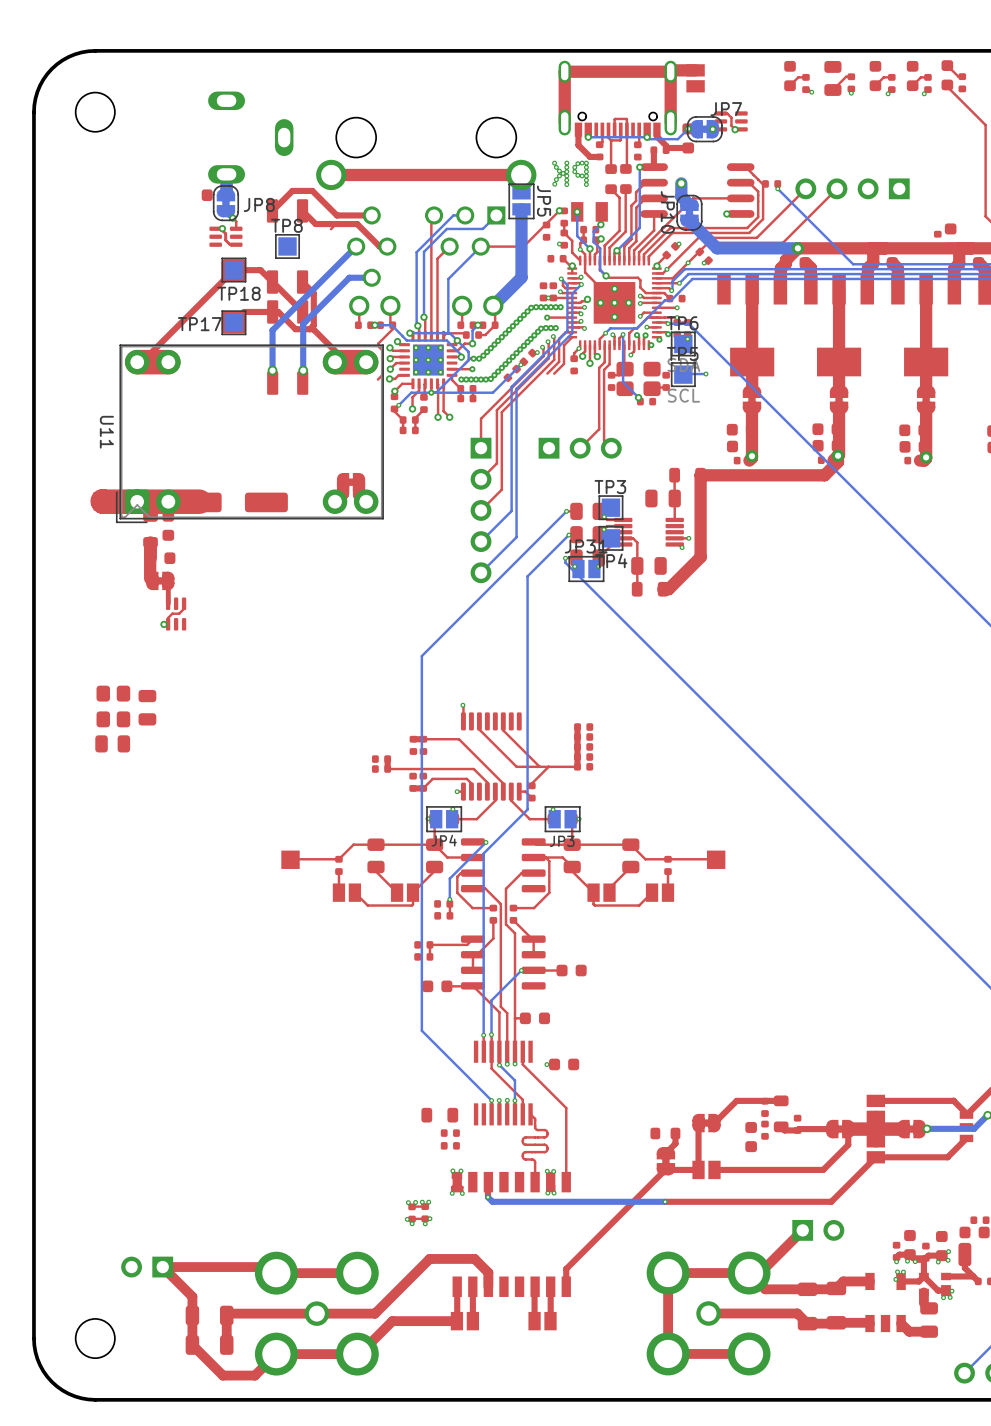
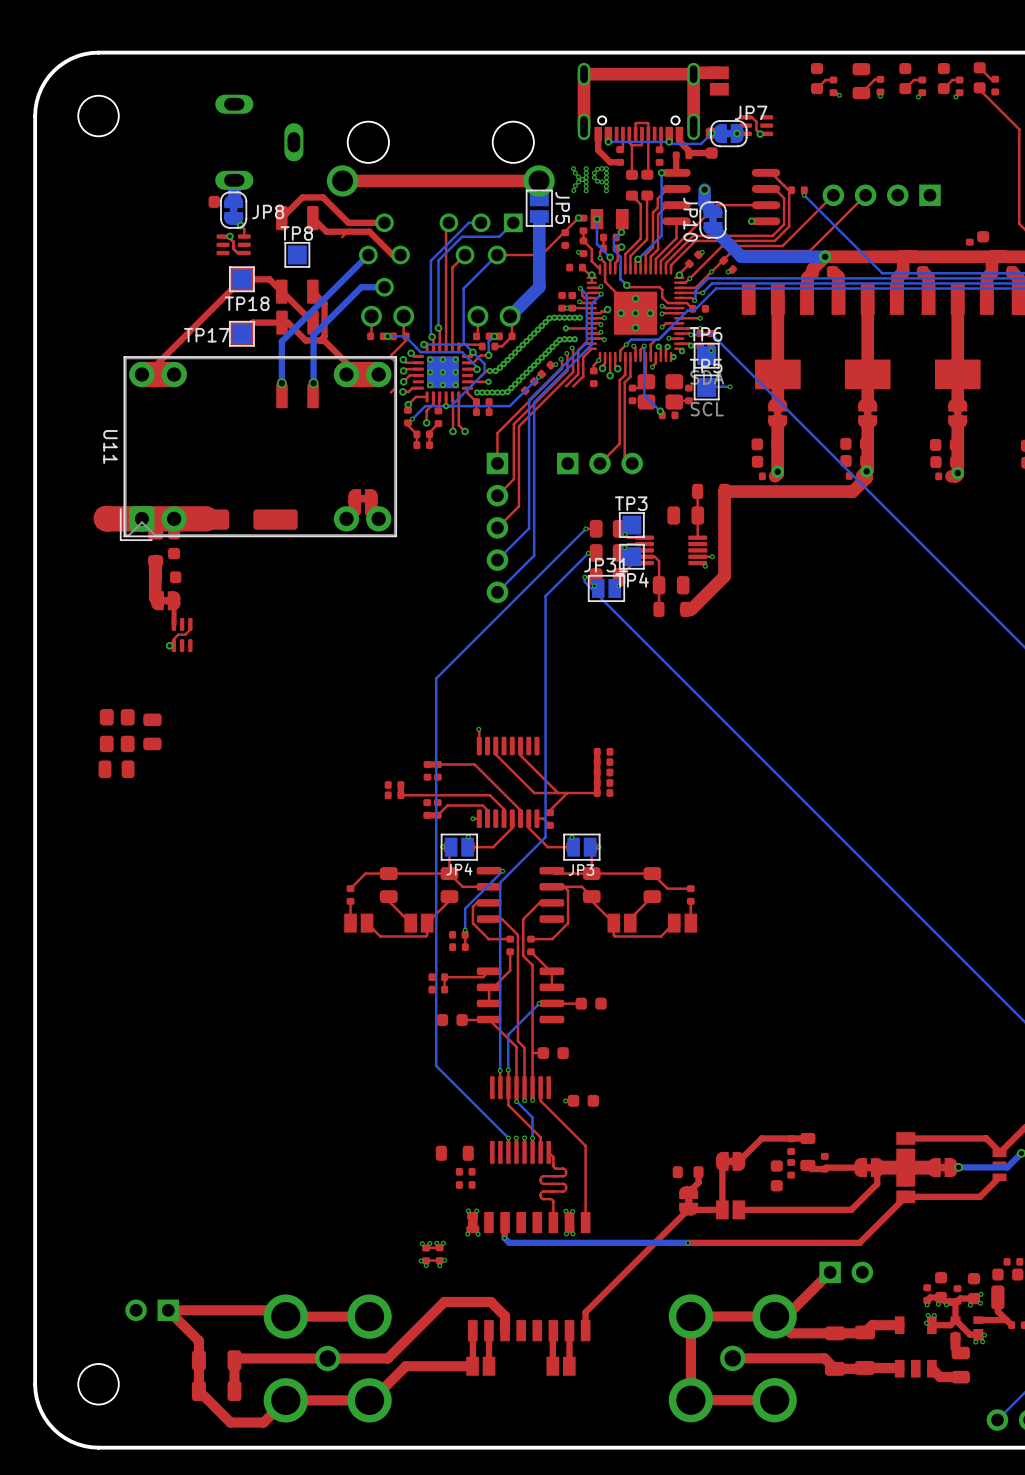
part: (290, 859) -> none
top track: (338, 859) (290, 859) -> none
top track: (667, 859) (716, 859) -> none
part: (716, 859) -> none

